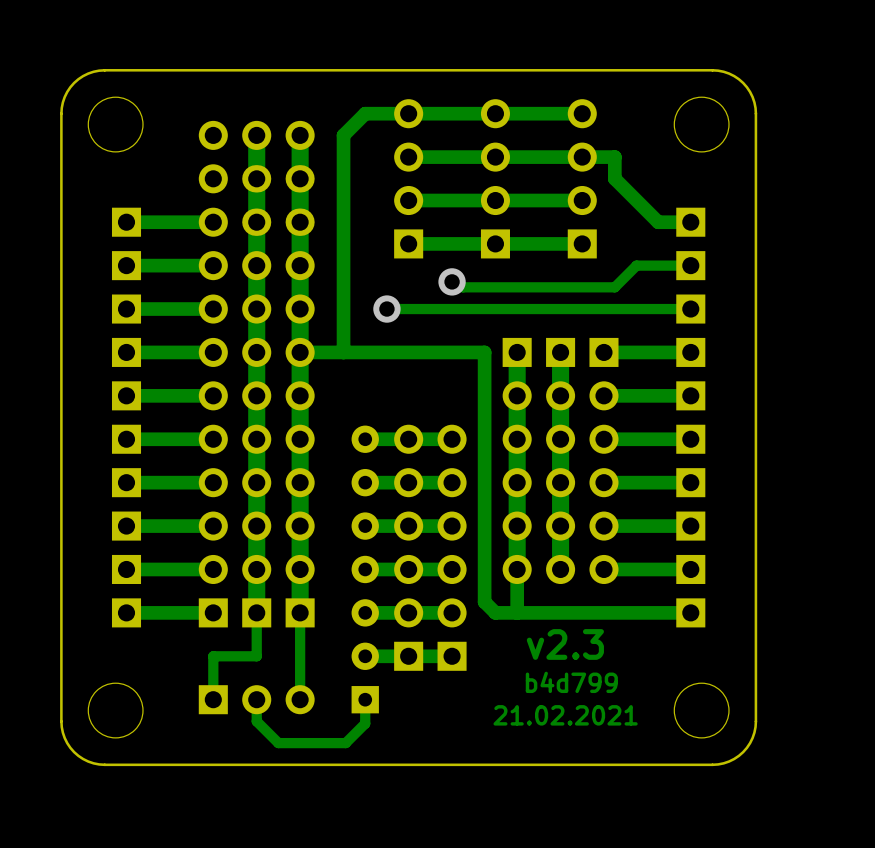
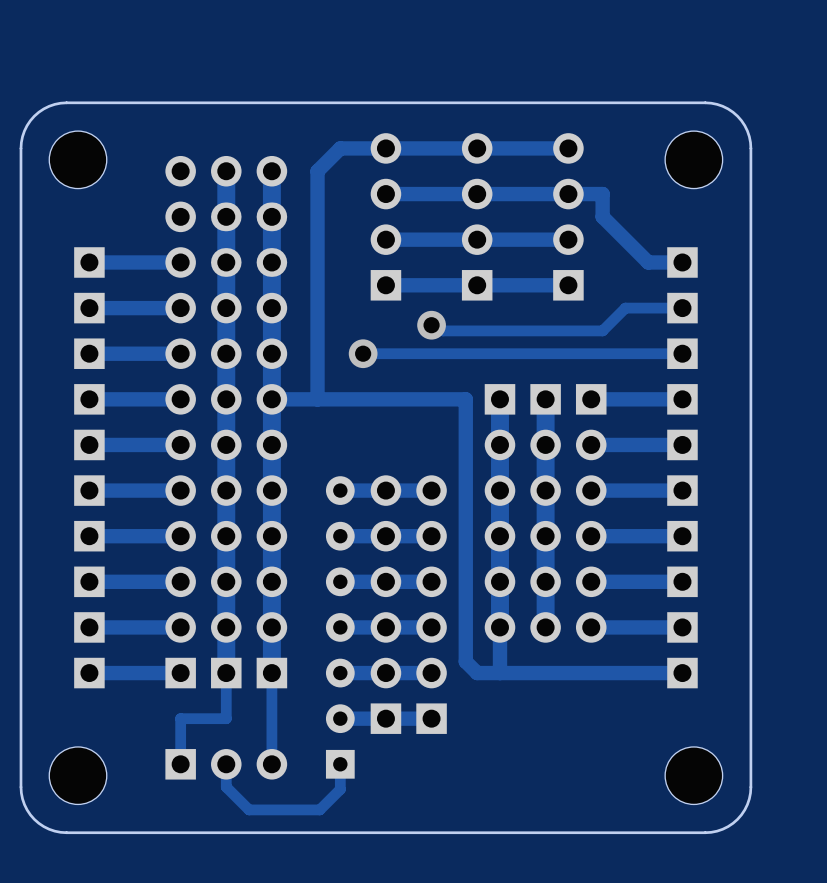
text: v2.3 (565, 644) -> none
text: b4d799 (571, 682) -> none
text: 21.02.2021 (565, 715) -> none

